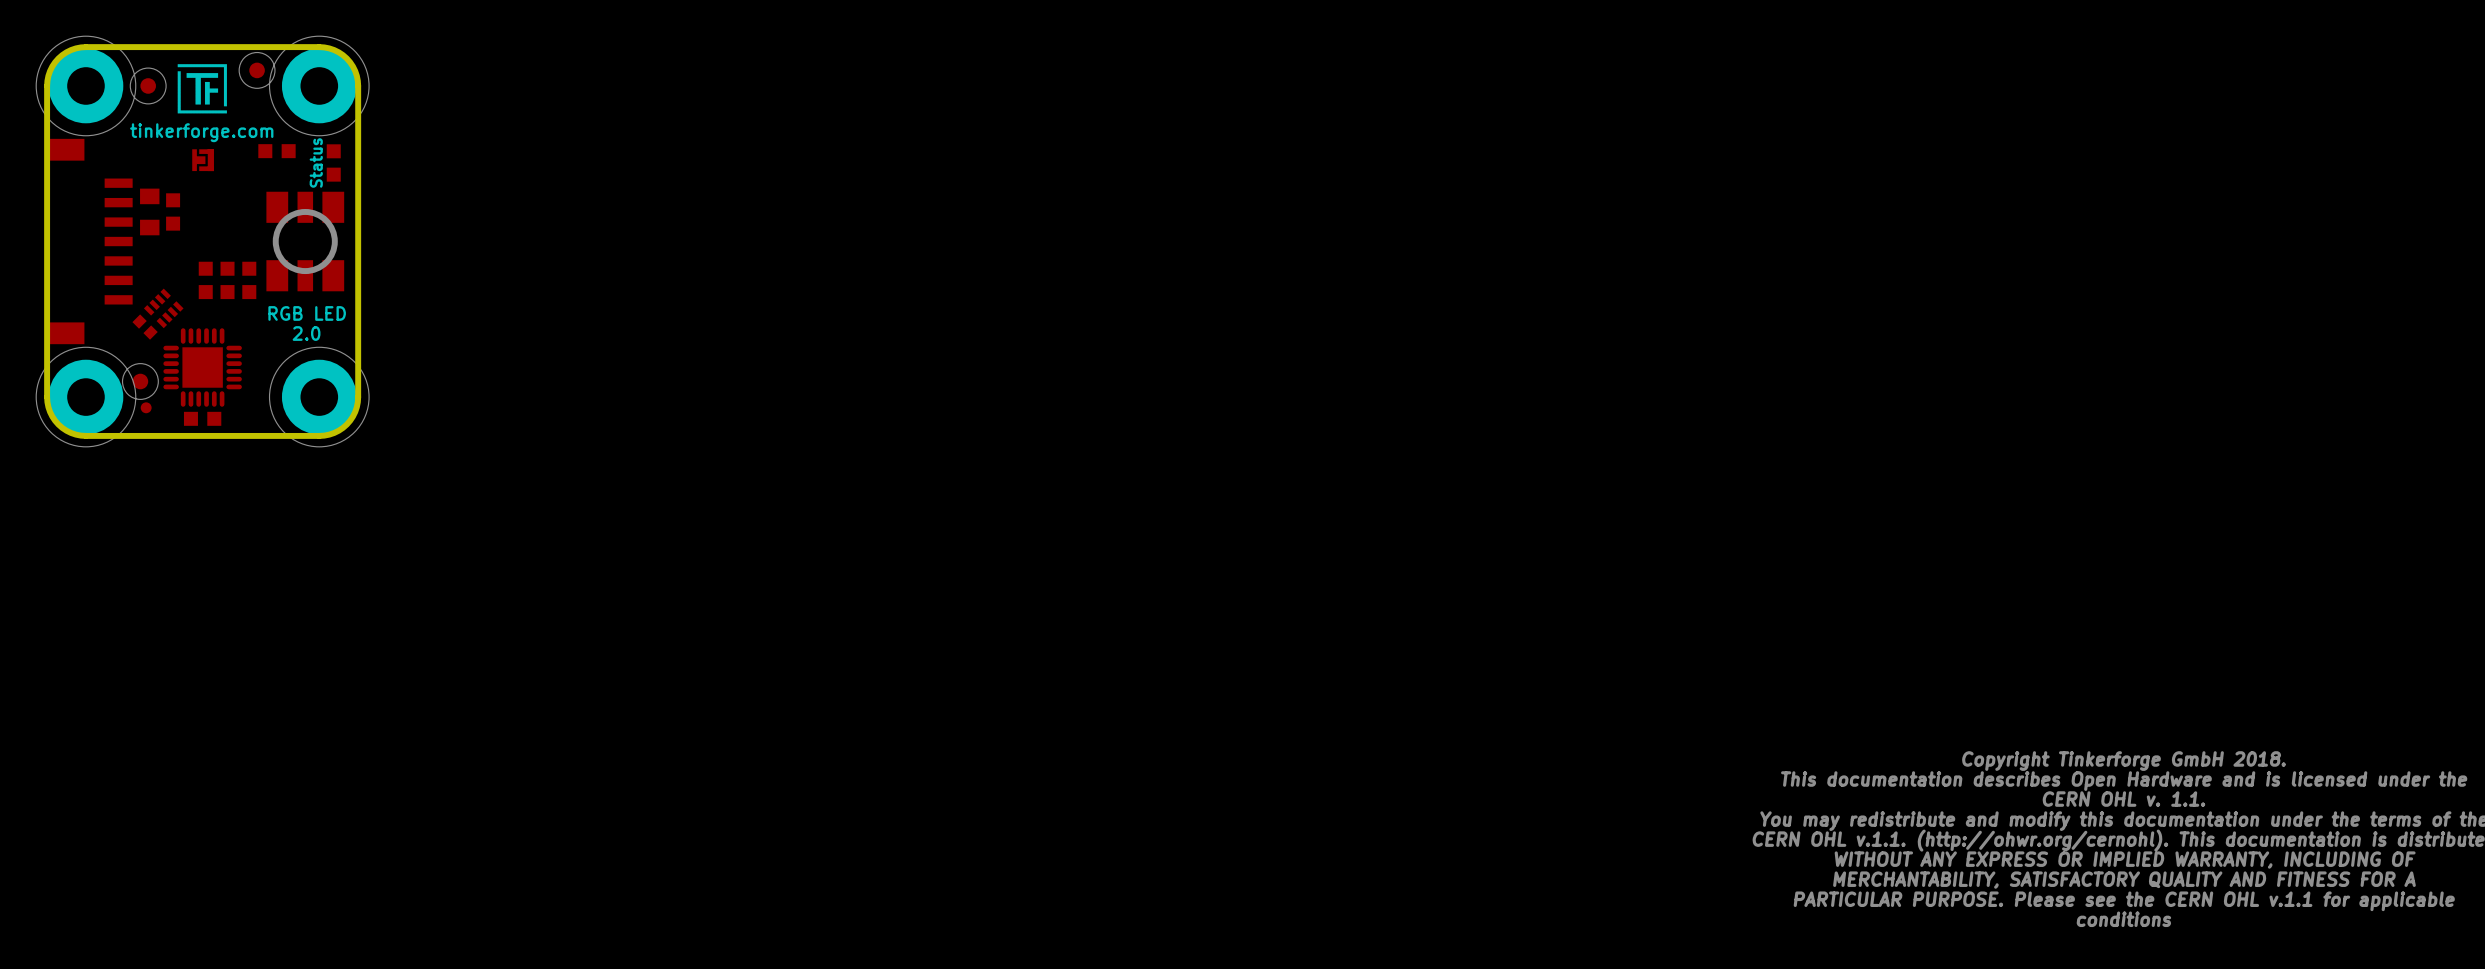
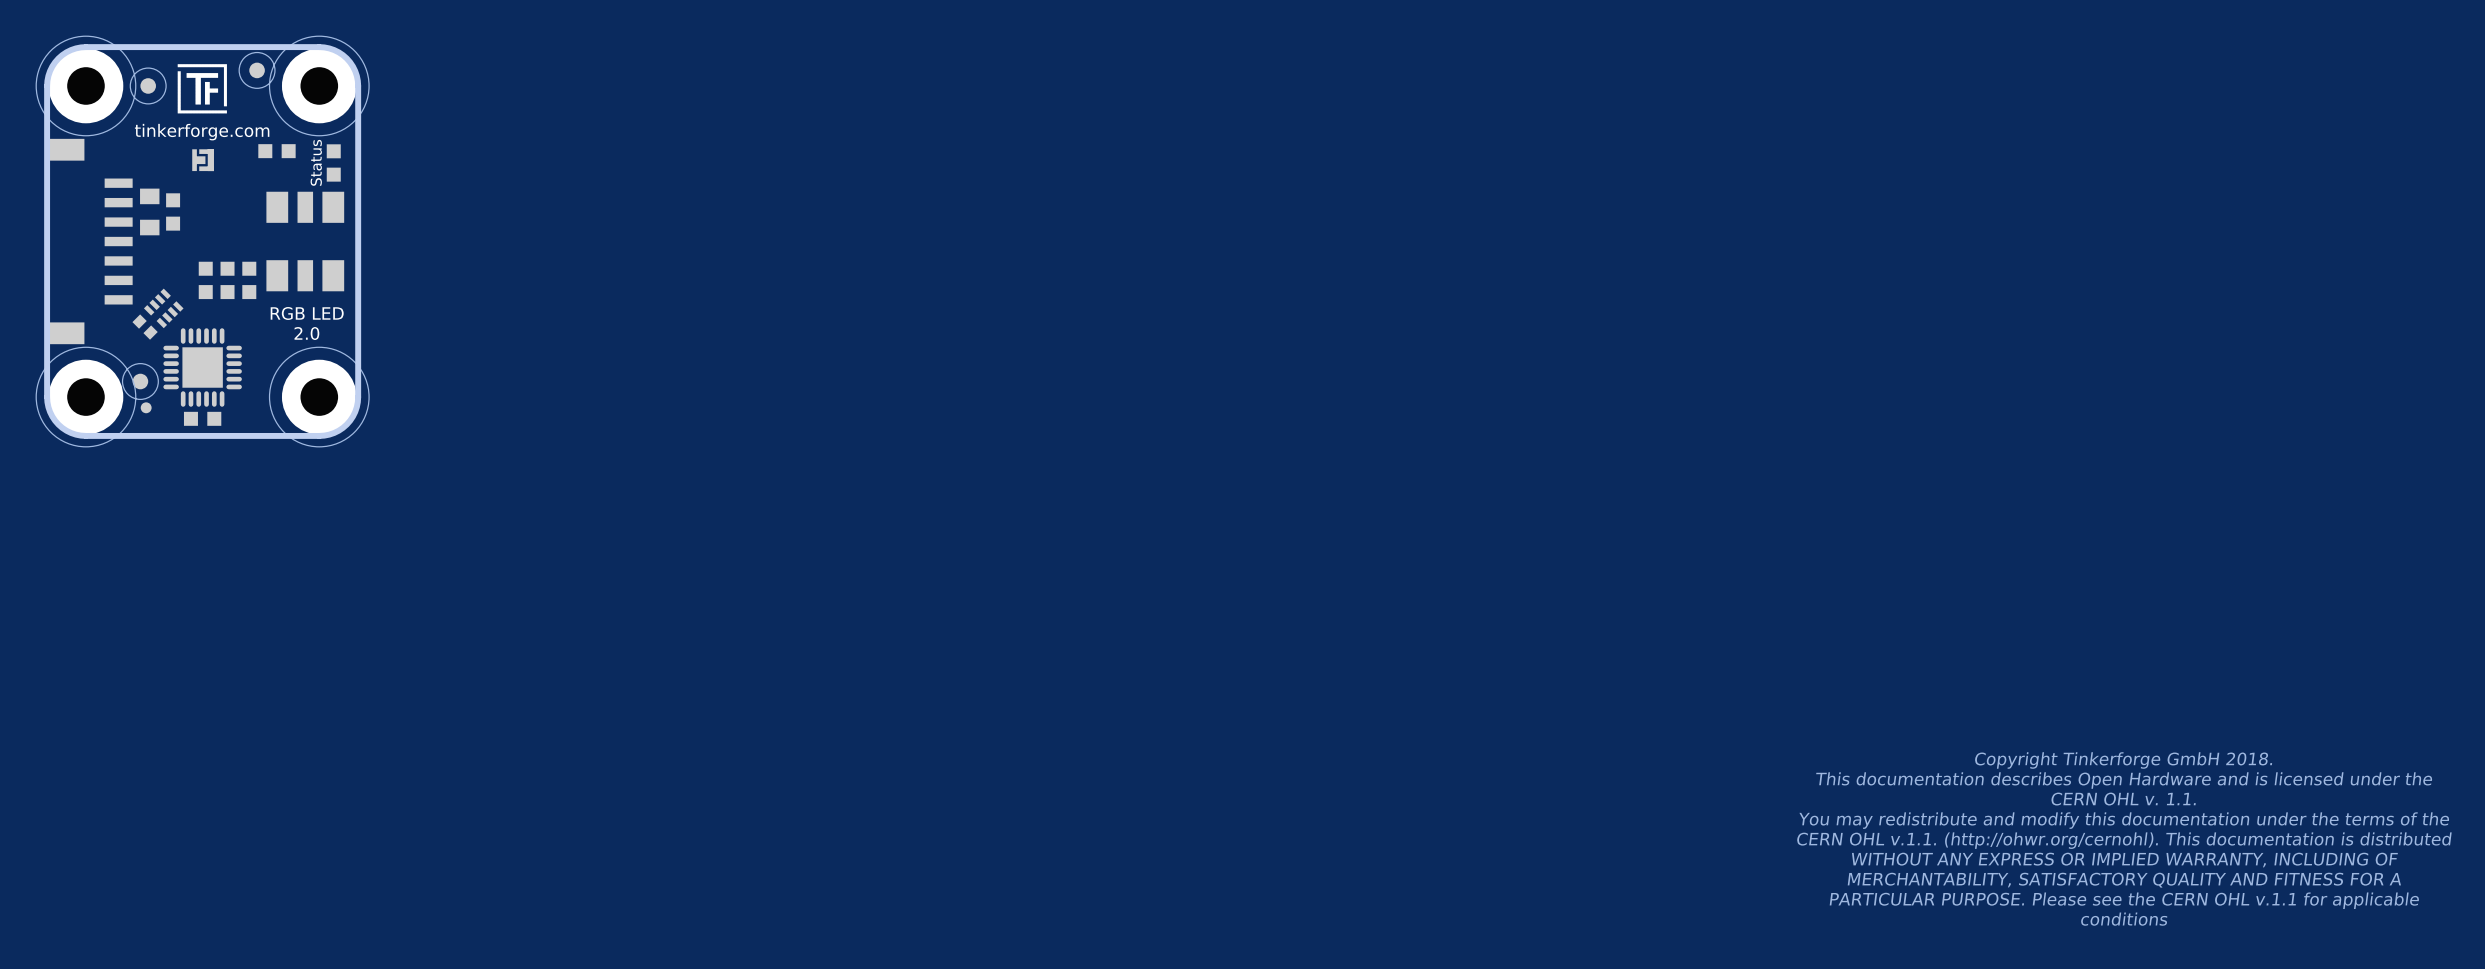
drawing: [272, 209, 338, 275] -> none

